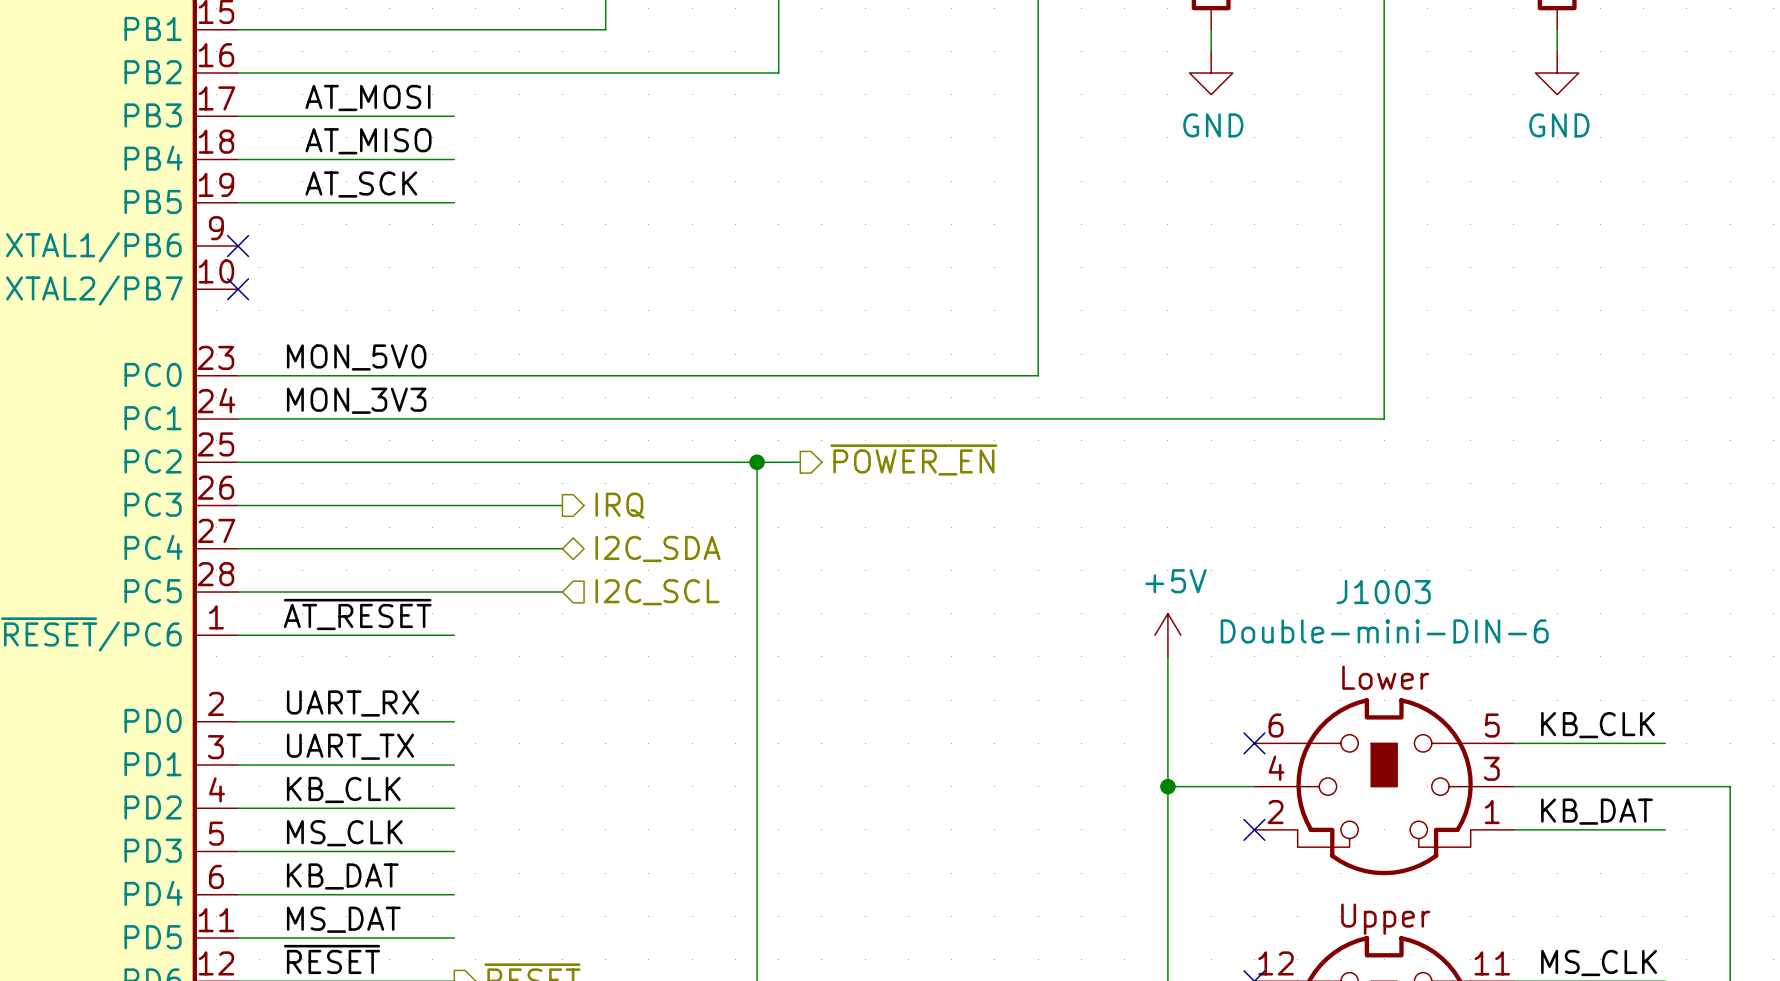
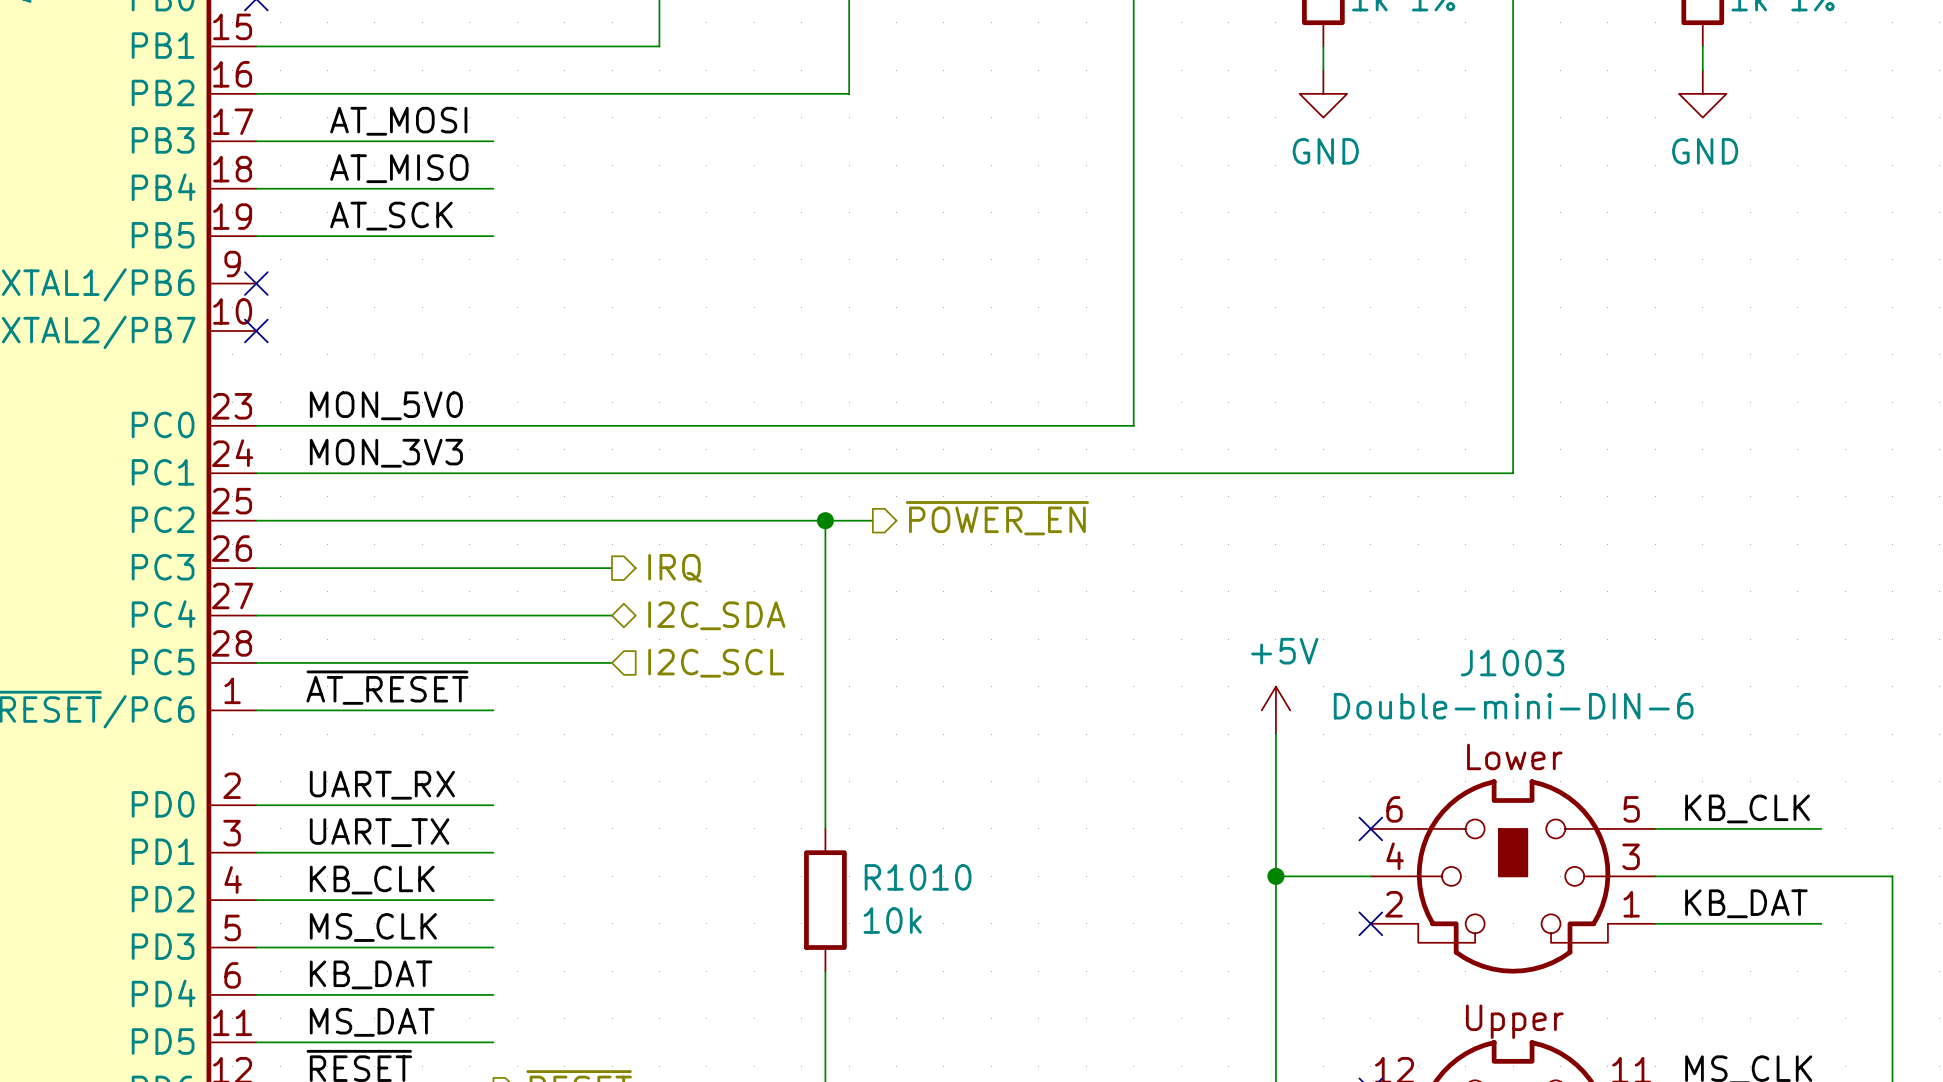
wire: (757, 743) (757, 873) -> none
R1010: none -> 10k (825, 900)

